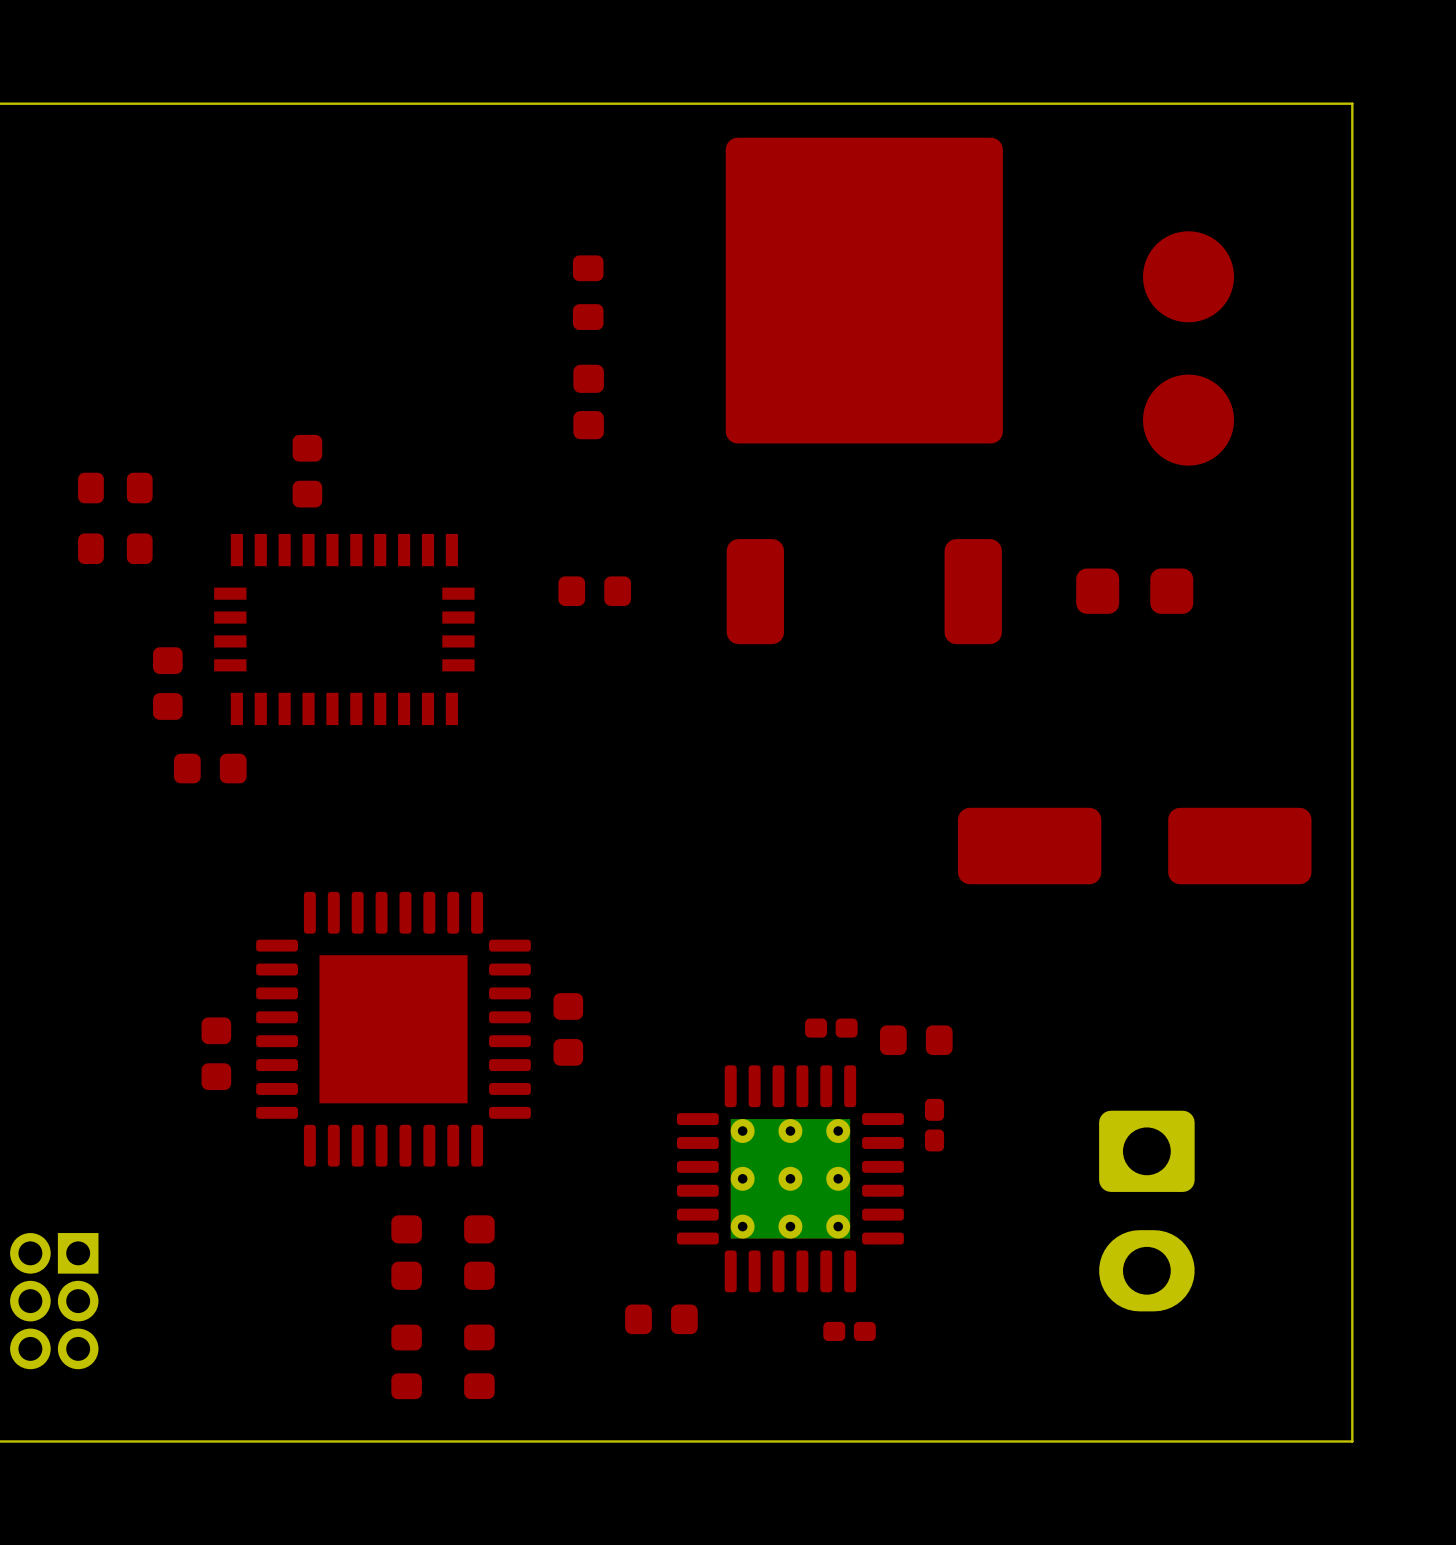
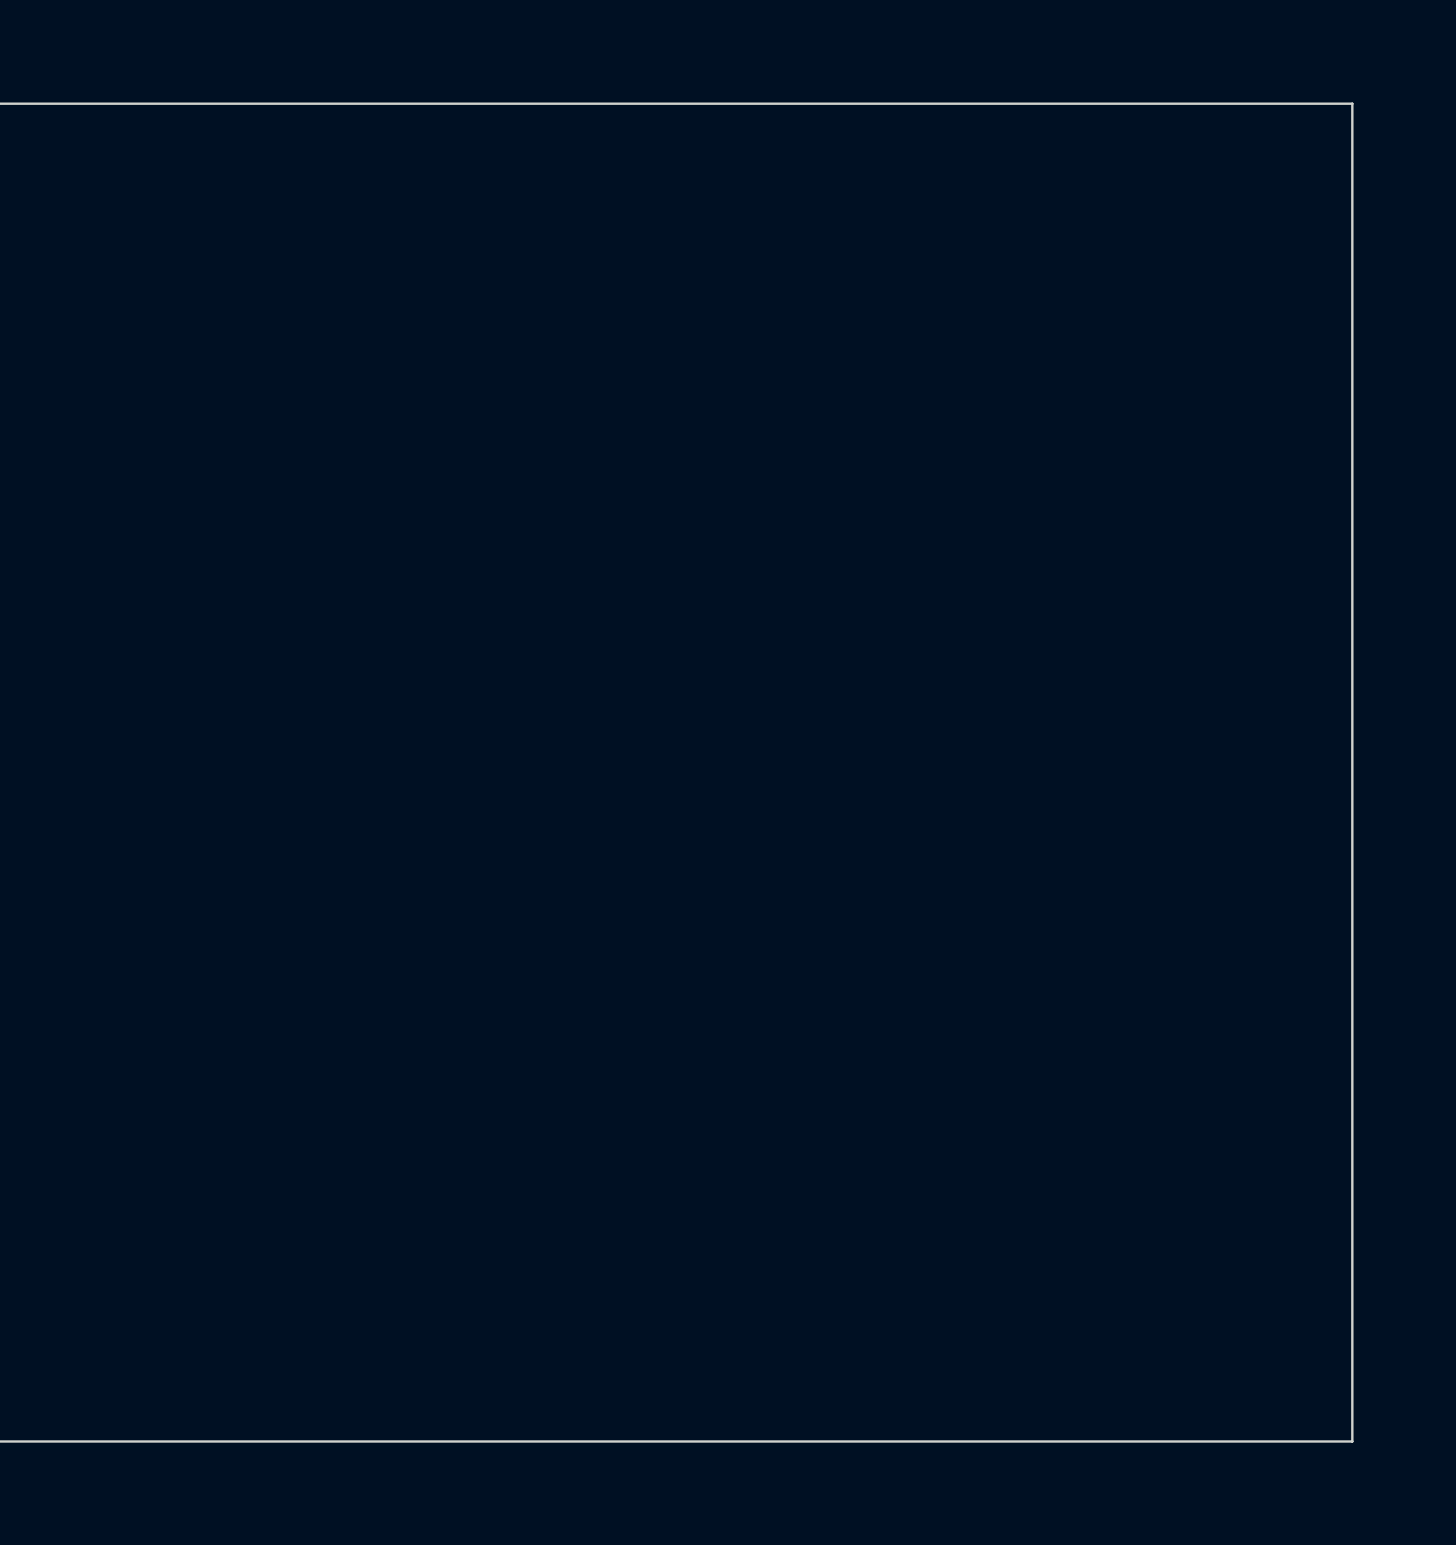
part: (588, 292) -> none
part: (1188, 348) -> none
part: (864, 390) -> none
part: (588, 401) -> none
part: (307, 471) -> none
part: (115, 488) -> none
part: (115, 548) -> none
part: (594, 591) -> none
part: (1134, 591) -> none
part: (344, 629) -> none
part: (167, 683) -> none
part: (210, 768) -> none
part: (1134, 846) -> none
part: (831, 1028) -> none
part: (393, 1029) -> none
part: (568, 1029) -> none
part: (916, 1040) -> none
part: (216, 1053) -> none
part: (934, 1125) -> none
part: (790, 1178) -> none
part: (1146, 1211) -> none
part: (406, 1252) -> none
part: (479, 1252) -> none
part: (54, 1301) -> none
part: (661, 1319) -> none
part: (849, 1331) -> none
part: (406, 1361) -> none
part: (479, 1361) -> none

